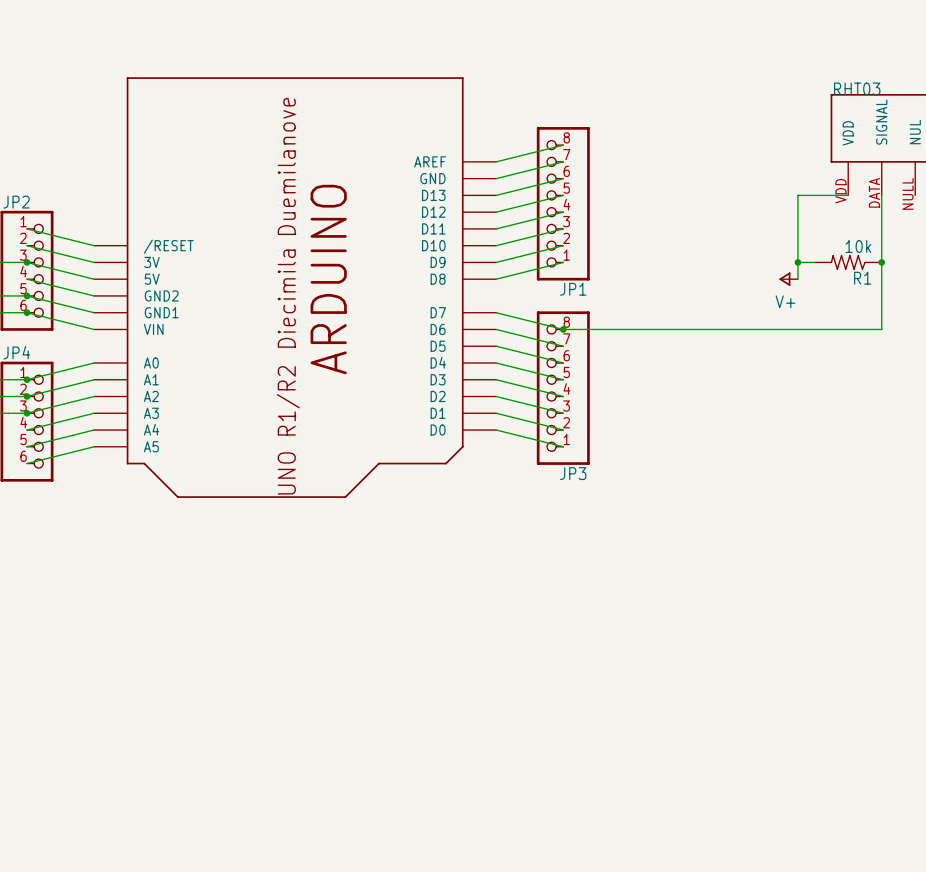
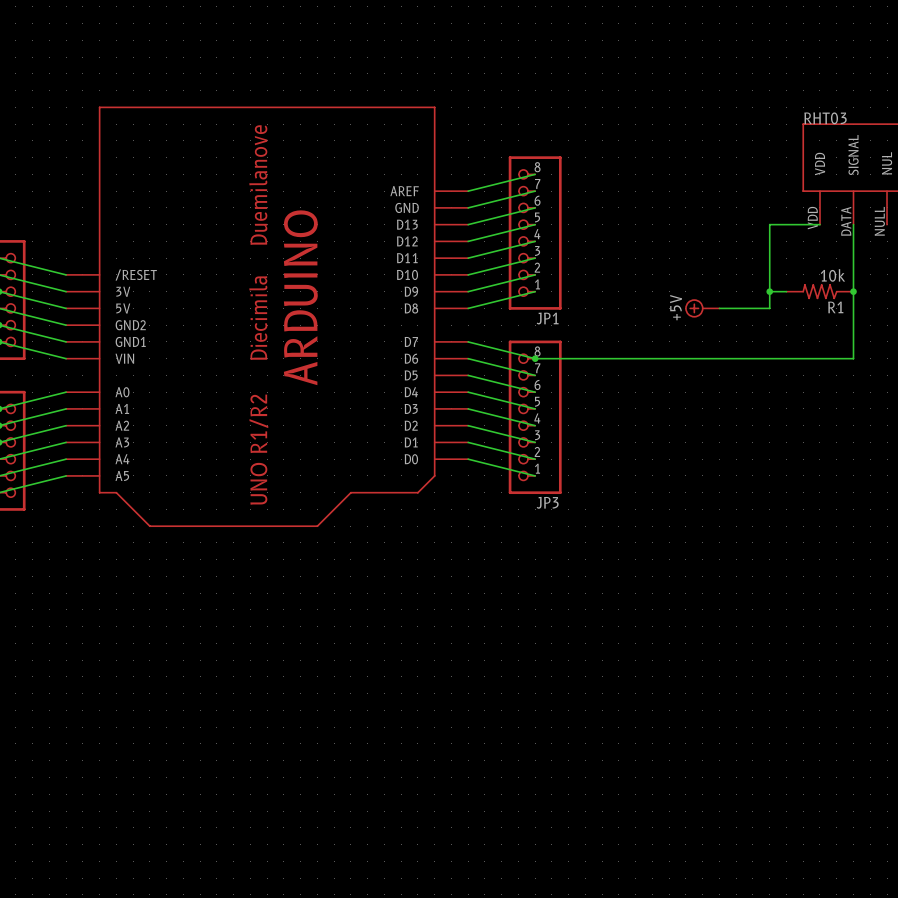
power symbol: none -> +5V (702, 308)
wire: none -> (719, 308) (769, 308)
power symbol: V+ (788, 279) -> none

